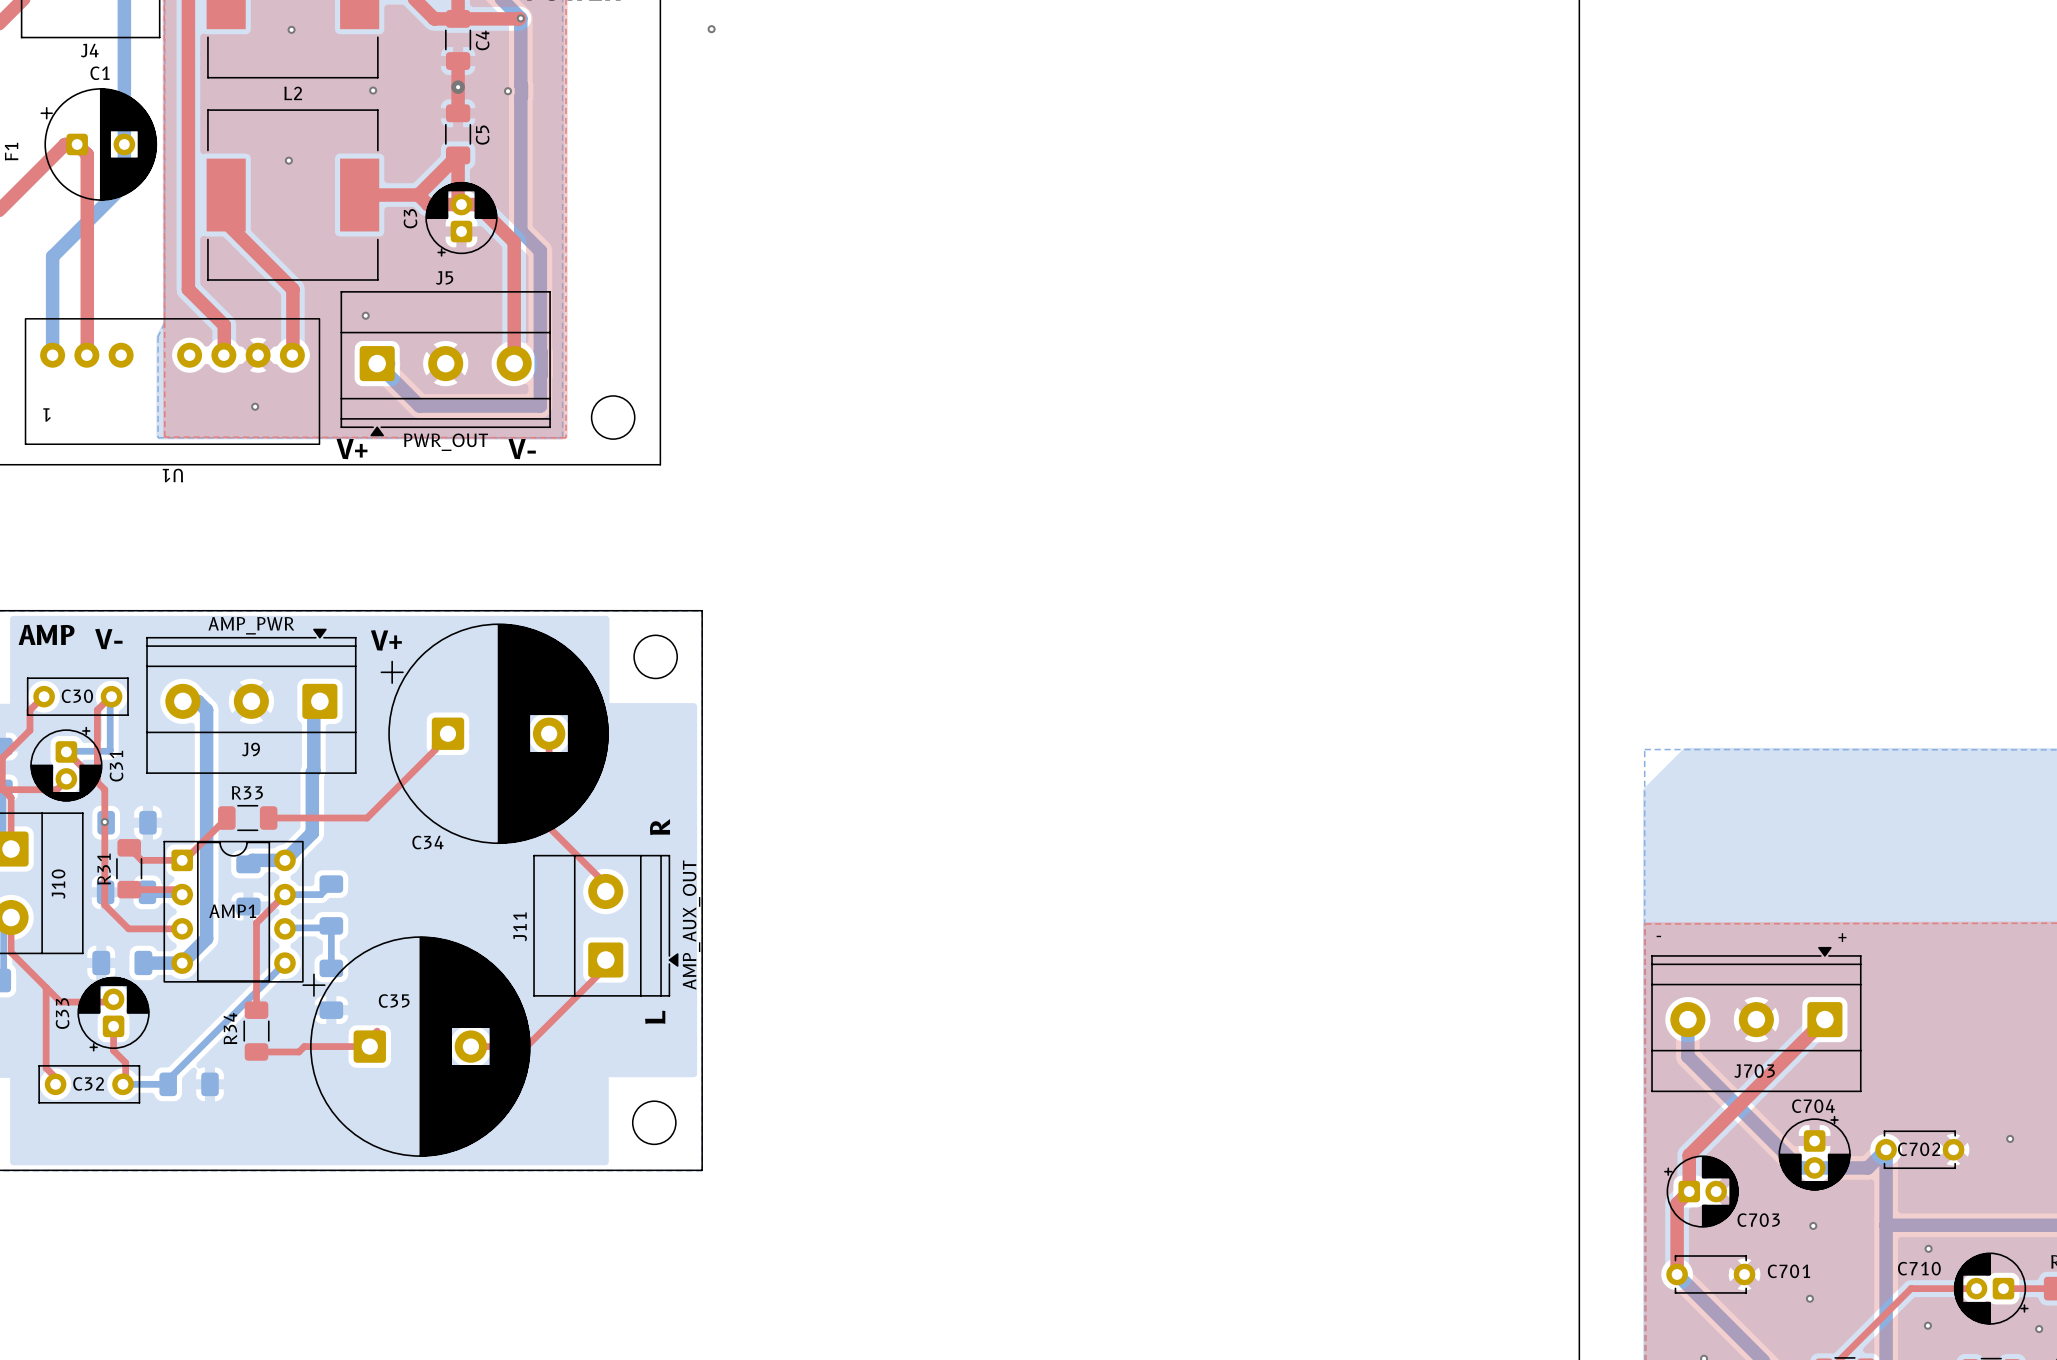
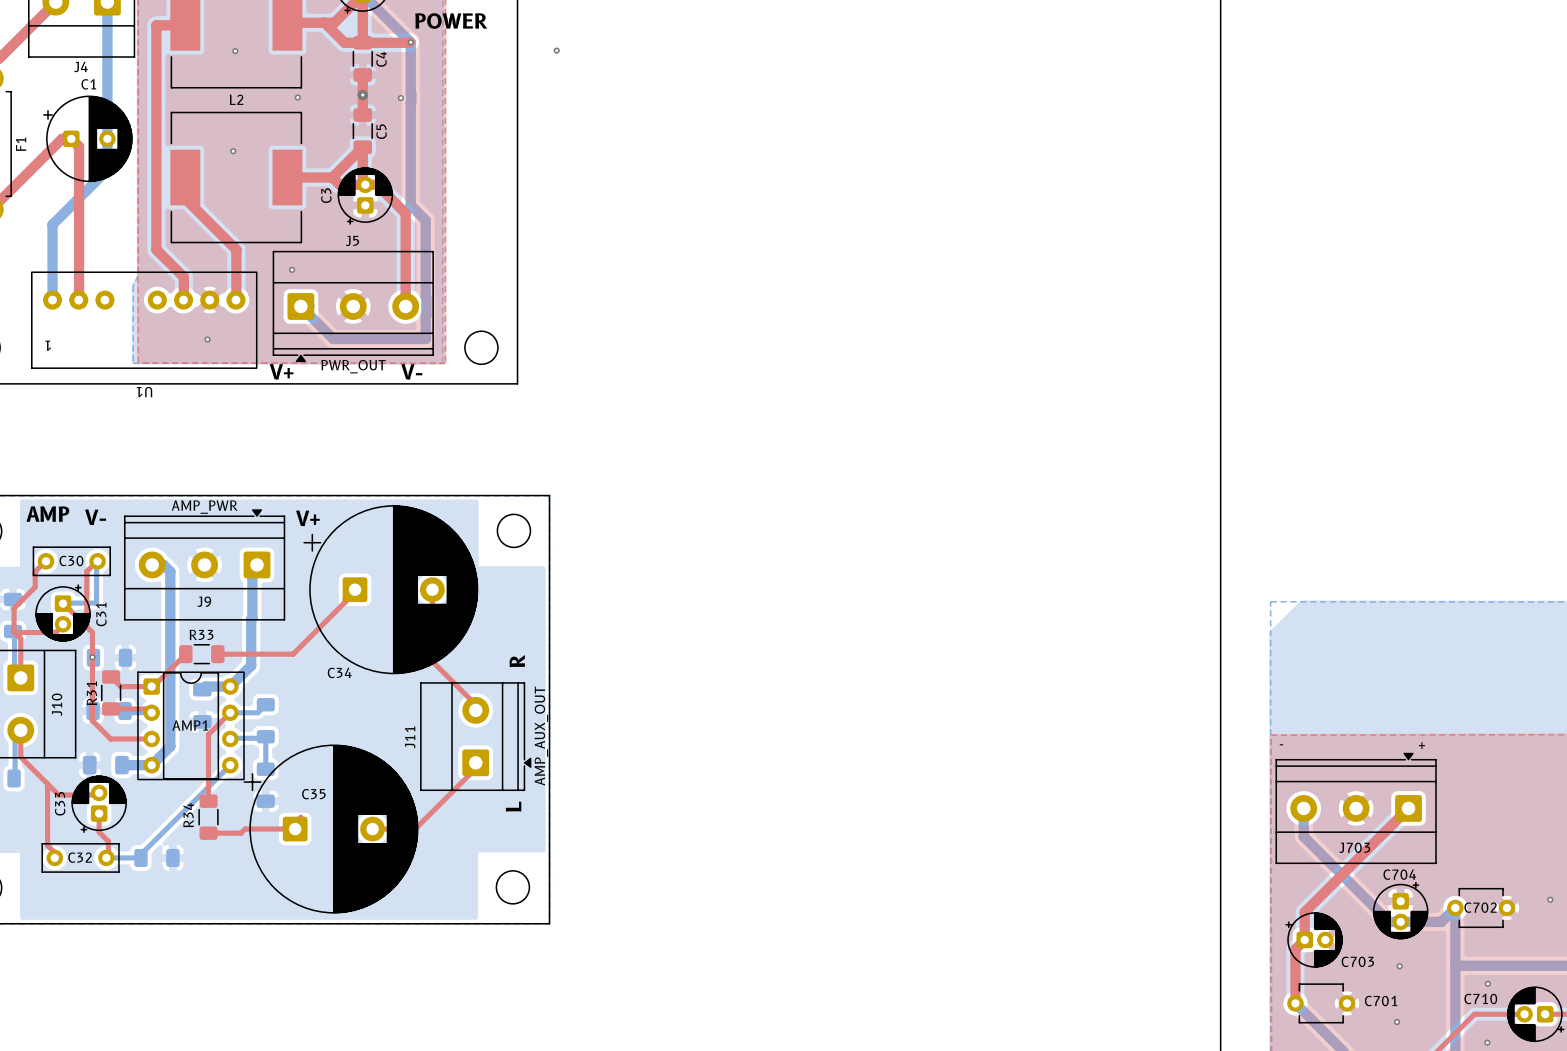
C702 footprint: [1875, 1130, 1965, 1170] -> [1447, 888, 1516, 928]
C701 footprint: [1666, 1255, 1756, 1294] -> [1287, 983, 1356, 1024]

